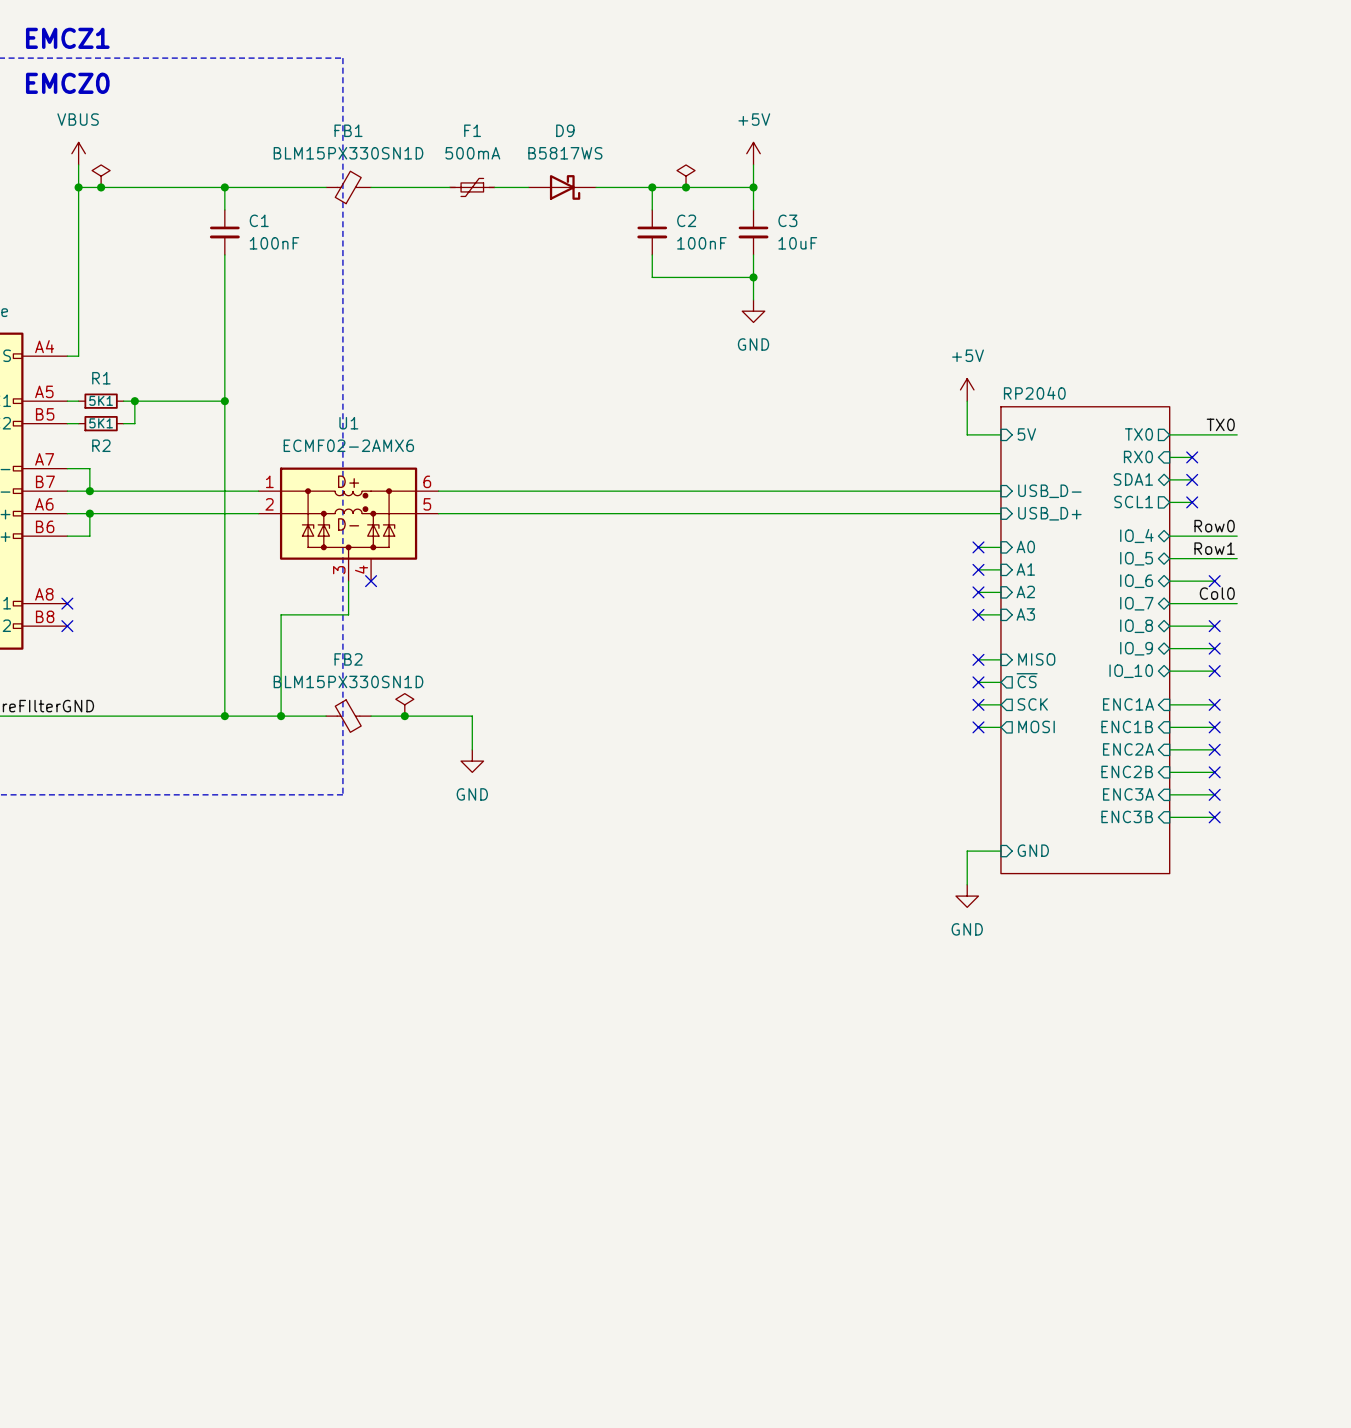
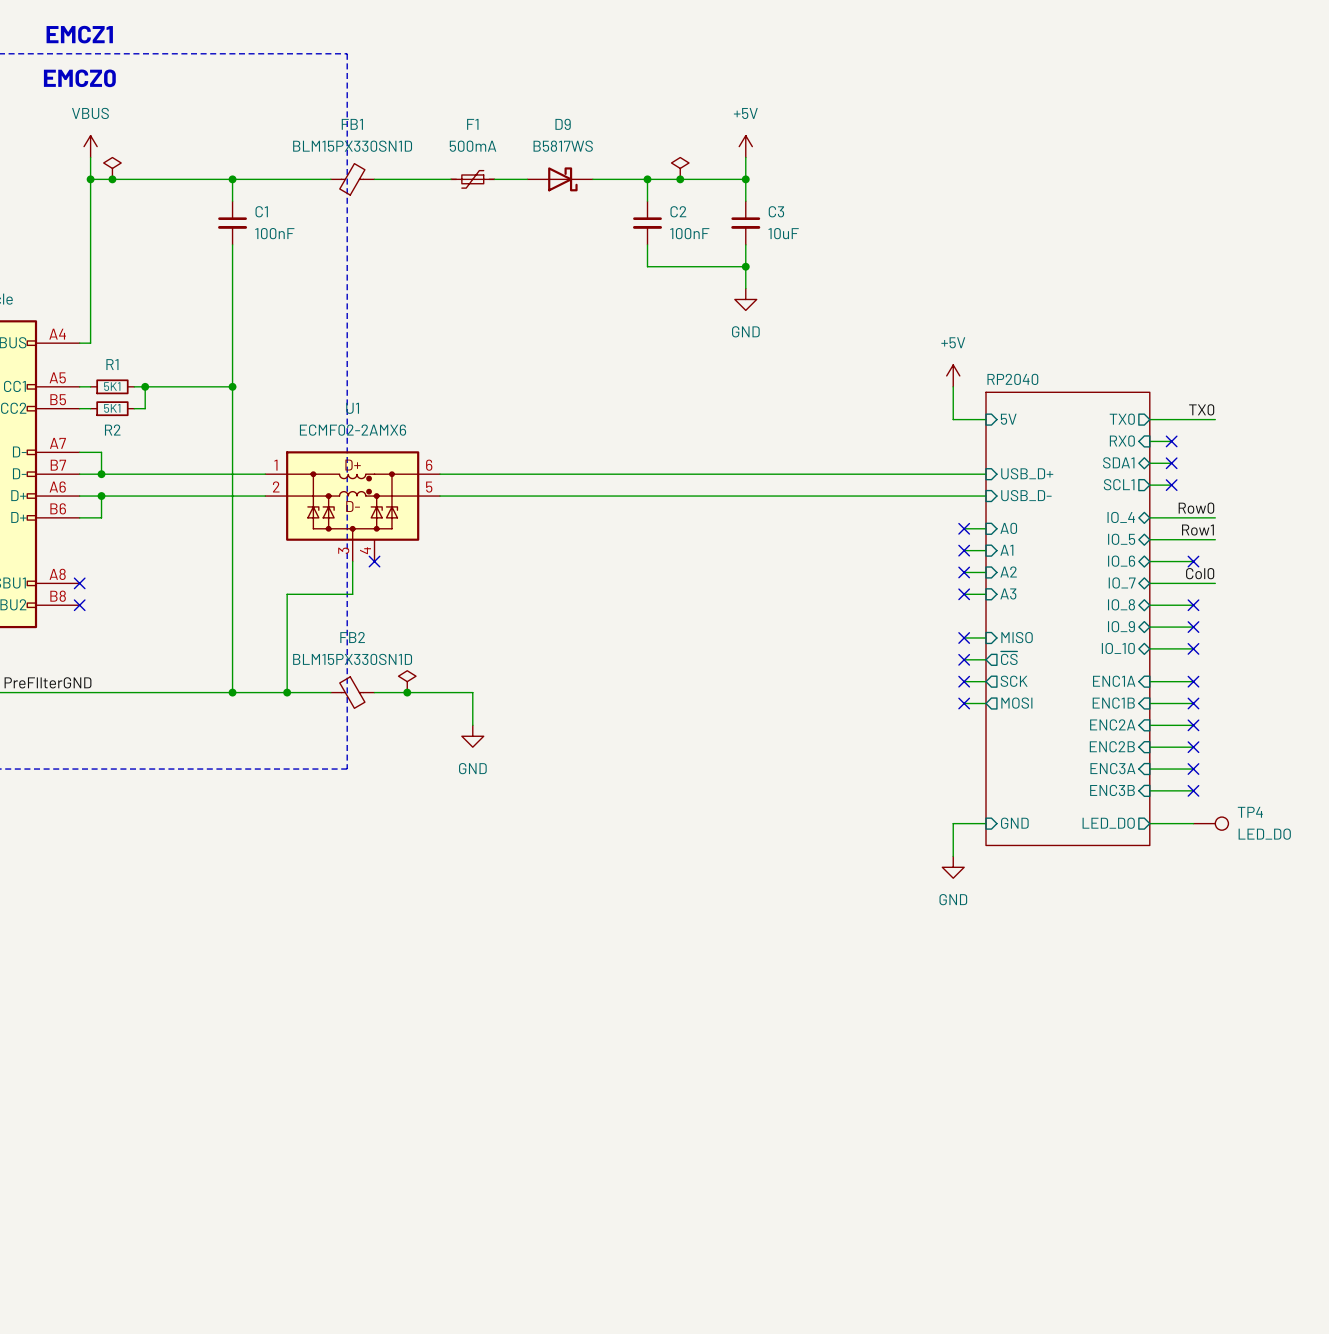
sheet pin: USB_D- (1049, 491) -> USB_D+ (1027, 473)
sheet pin: USB_D+ (1049, 513) -> USB_D- (1026, 495)
sheet pin: none -> LED_DO (1108, 823)
wire: none -> (1149, 823) (1193, 823)
TP4: none -> LED_DO (1210, 823)

